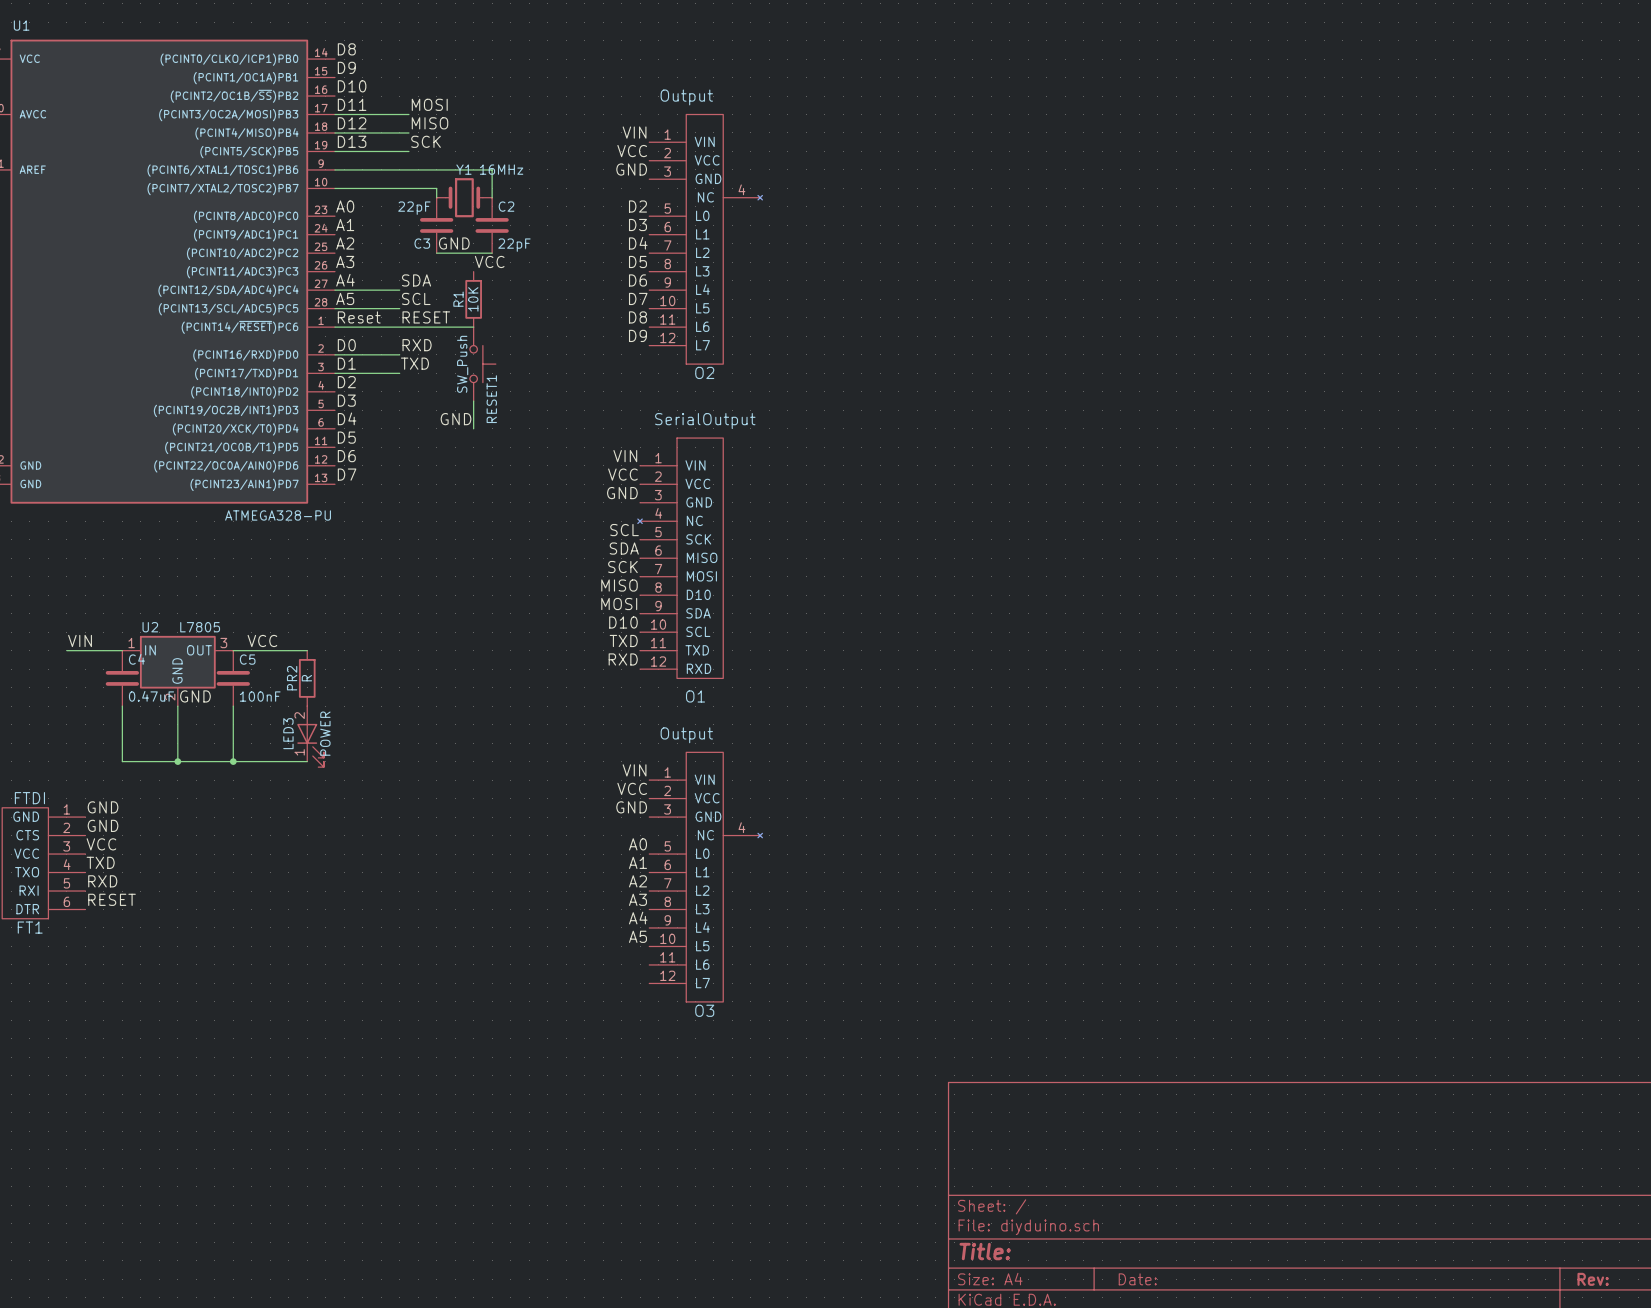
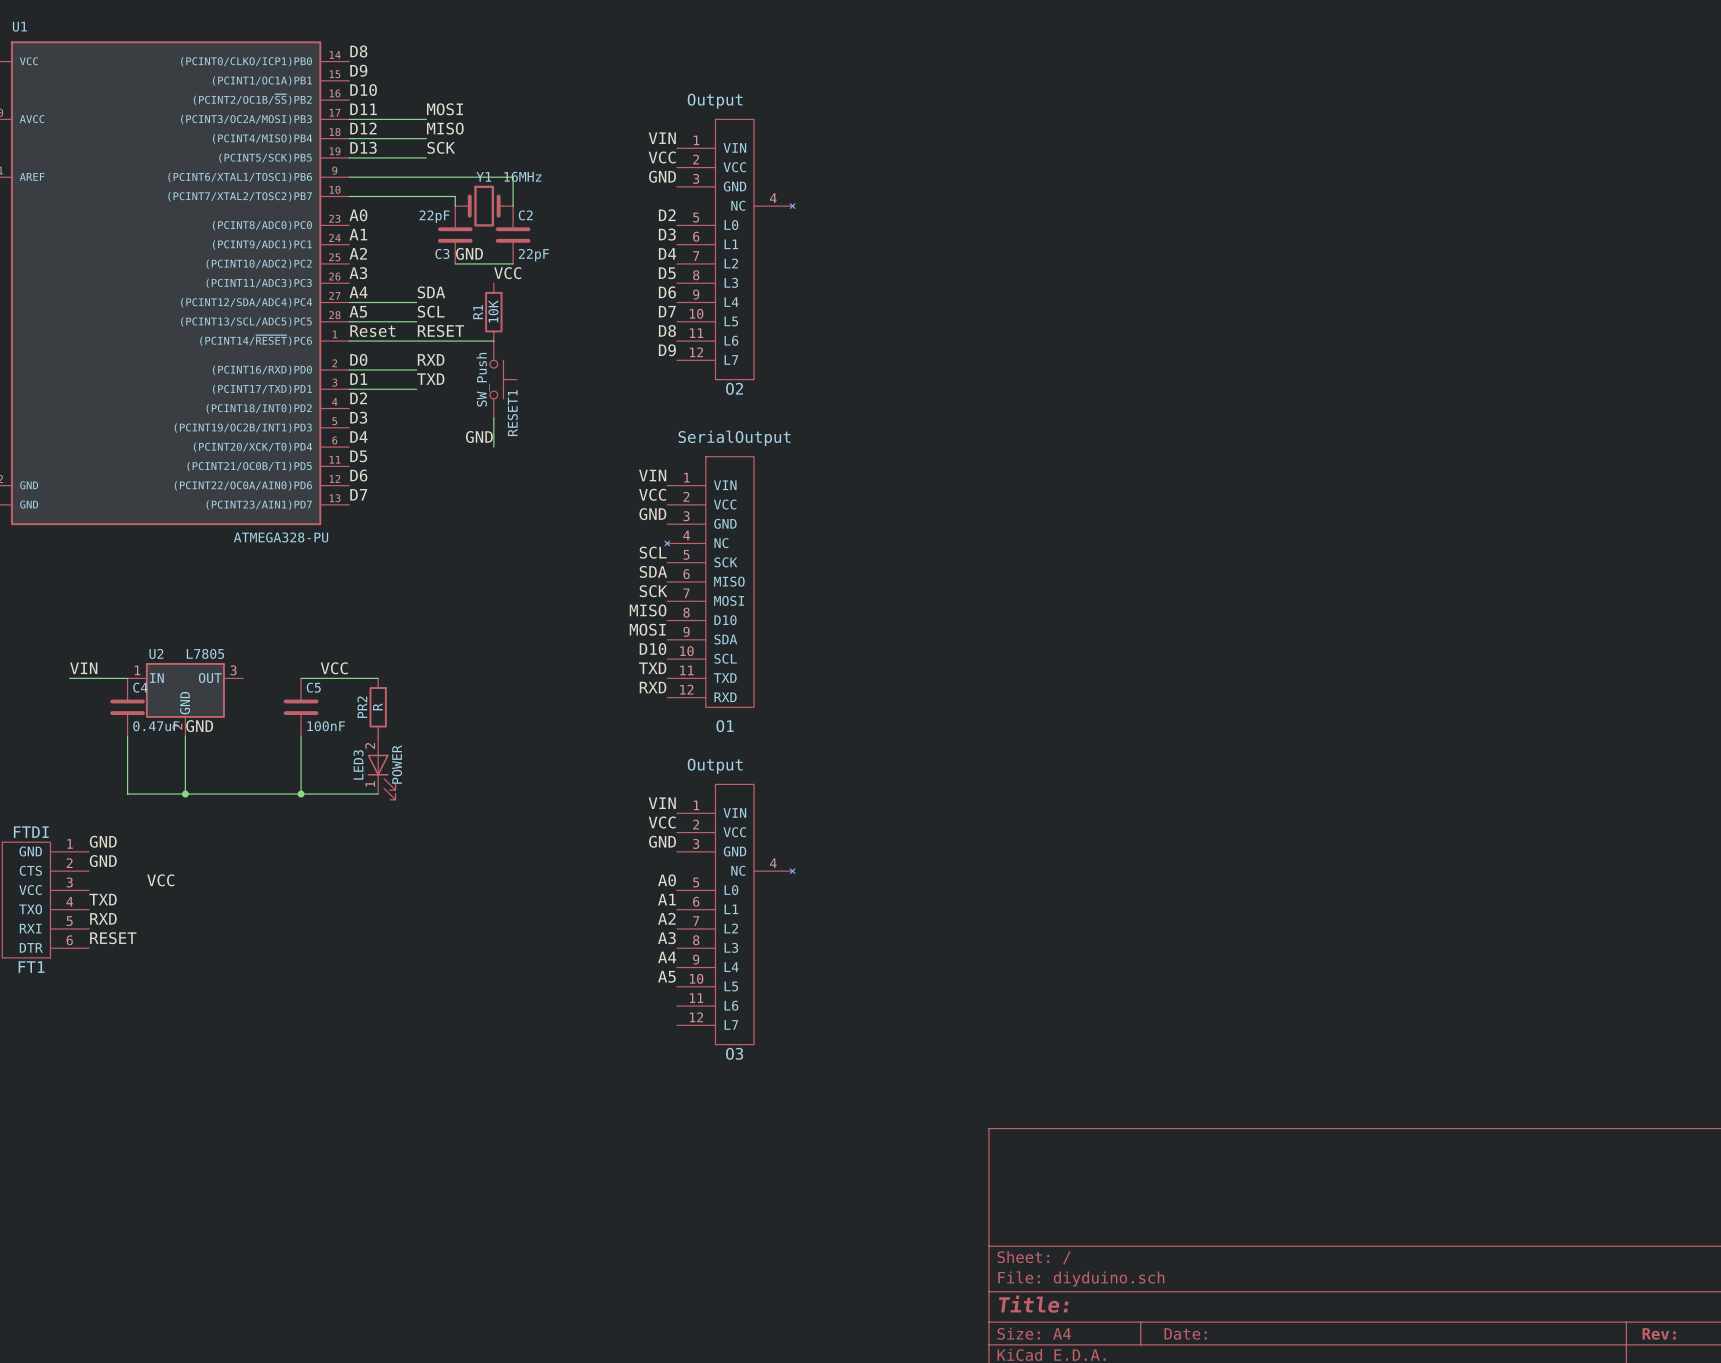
label position: VCC (262, 640) -> VCC (334, 668)
wire: (233, 650) (288, 650) -> (320, 678) (378, 678)
C5 position: (233, 678) -> (301, 707)
PR2 position: (307, 678) -> (378, 707)
wire: (233, 706) (233, 761) -> (301, 736) (301, 794)
LED3 position: (310, 736) -> (381, 768)
junction: (233, 761) -> none
junction: none -> (301, 794)
wire: none -> (320, 794) (378, 794)
label position: VCC (101, 844) -> VCC (160, 880)

